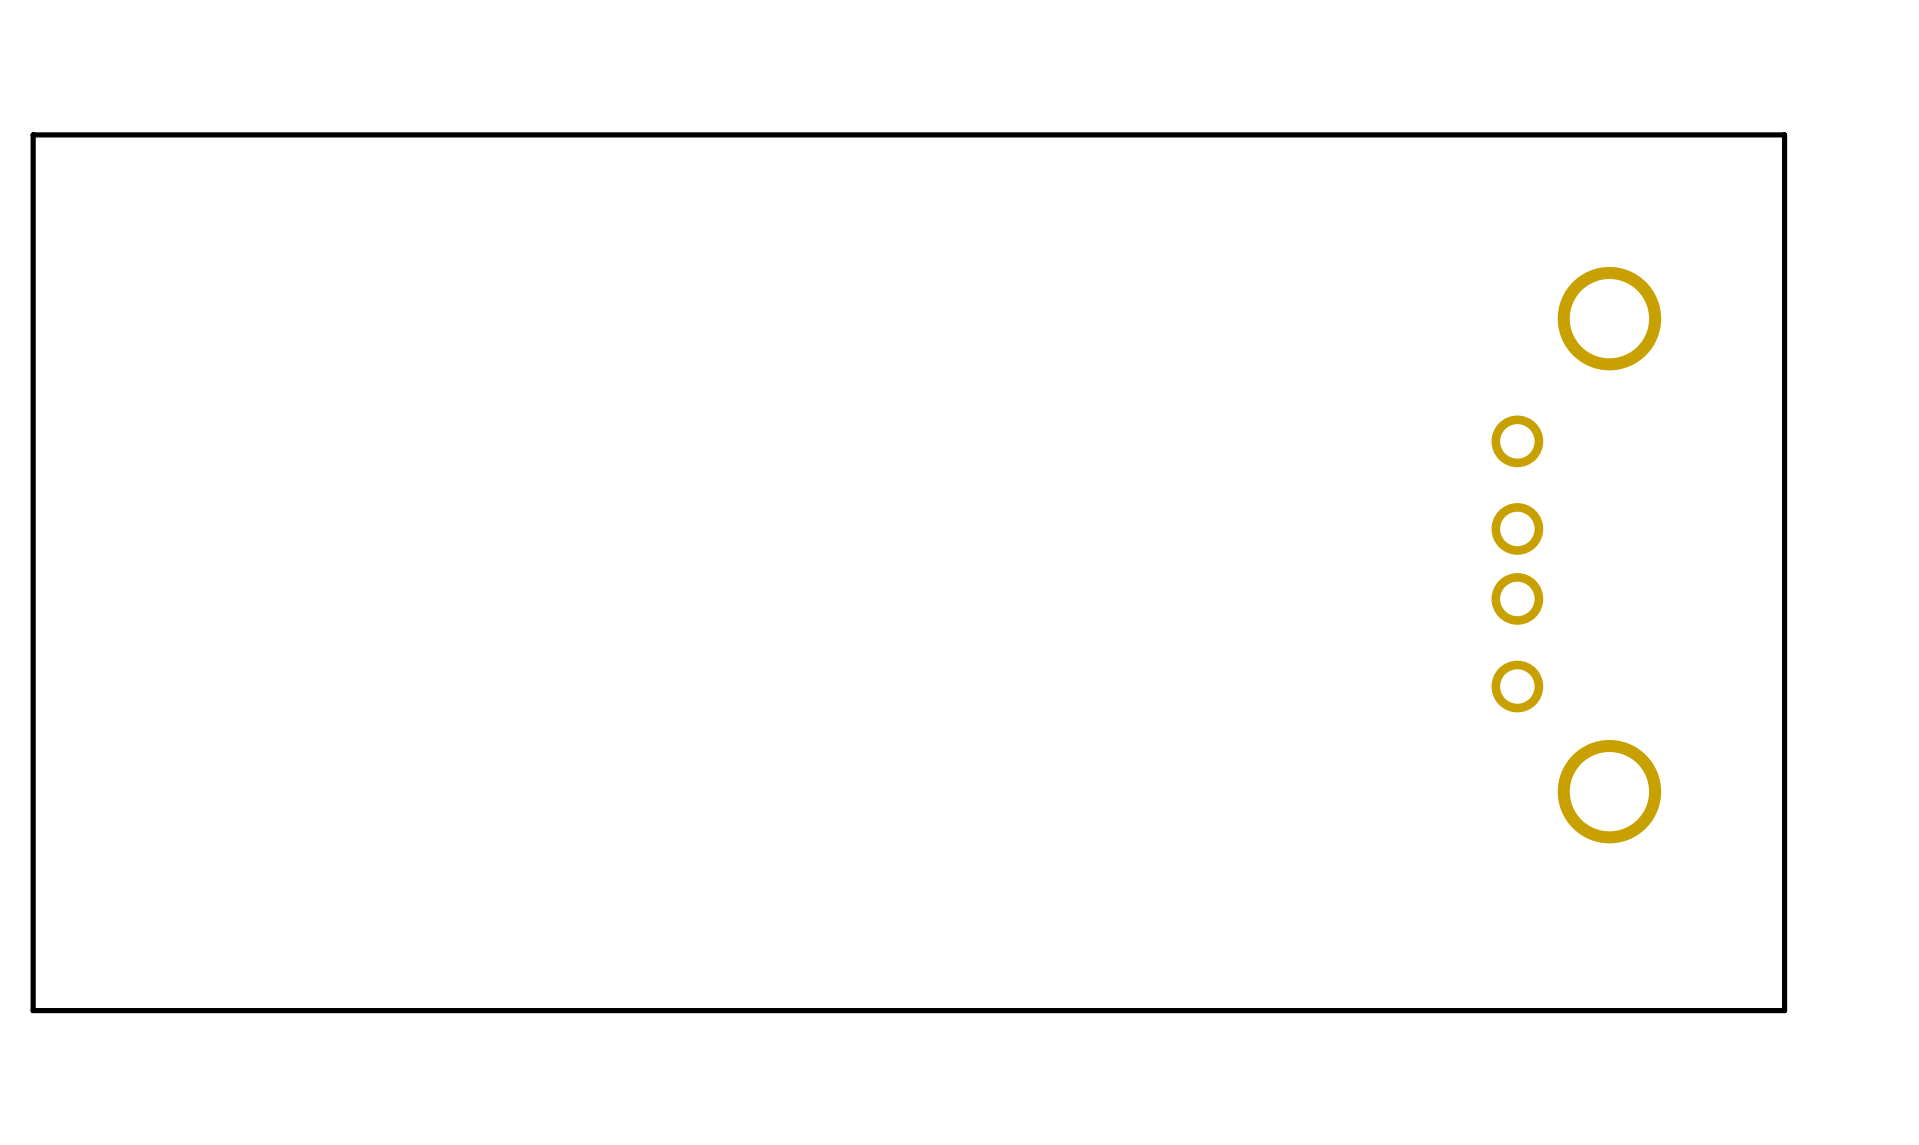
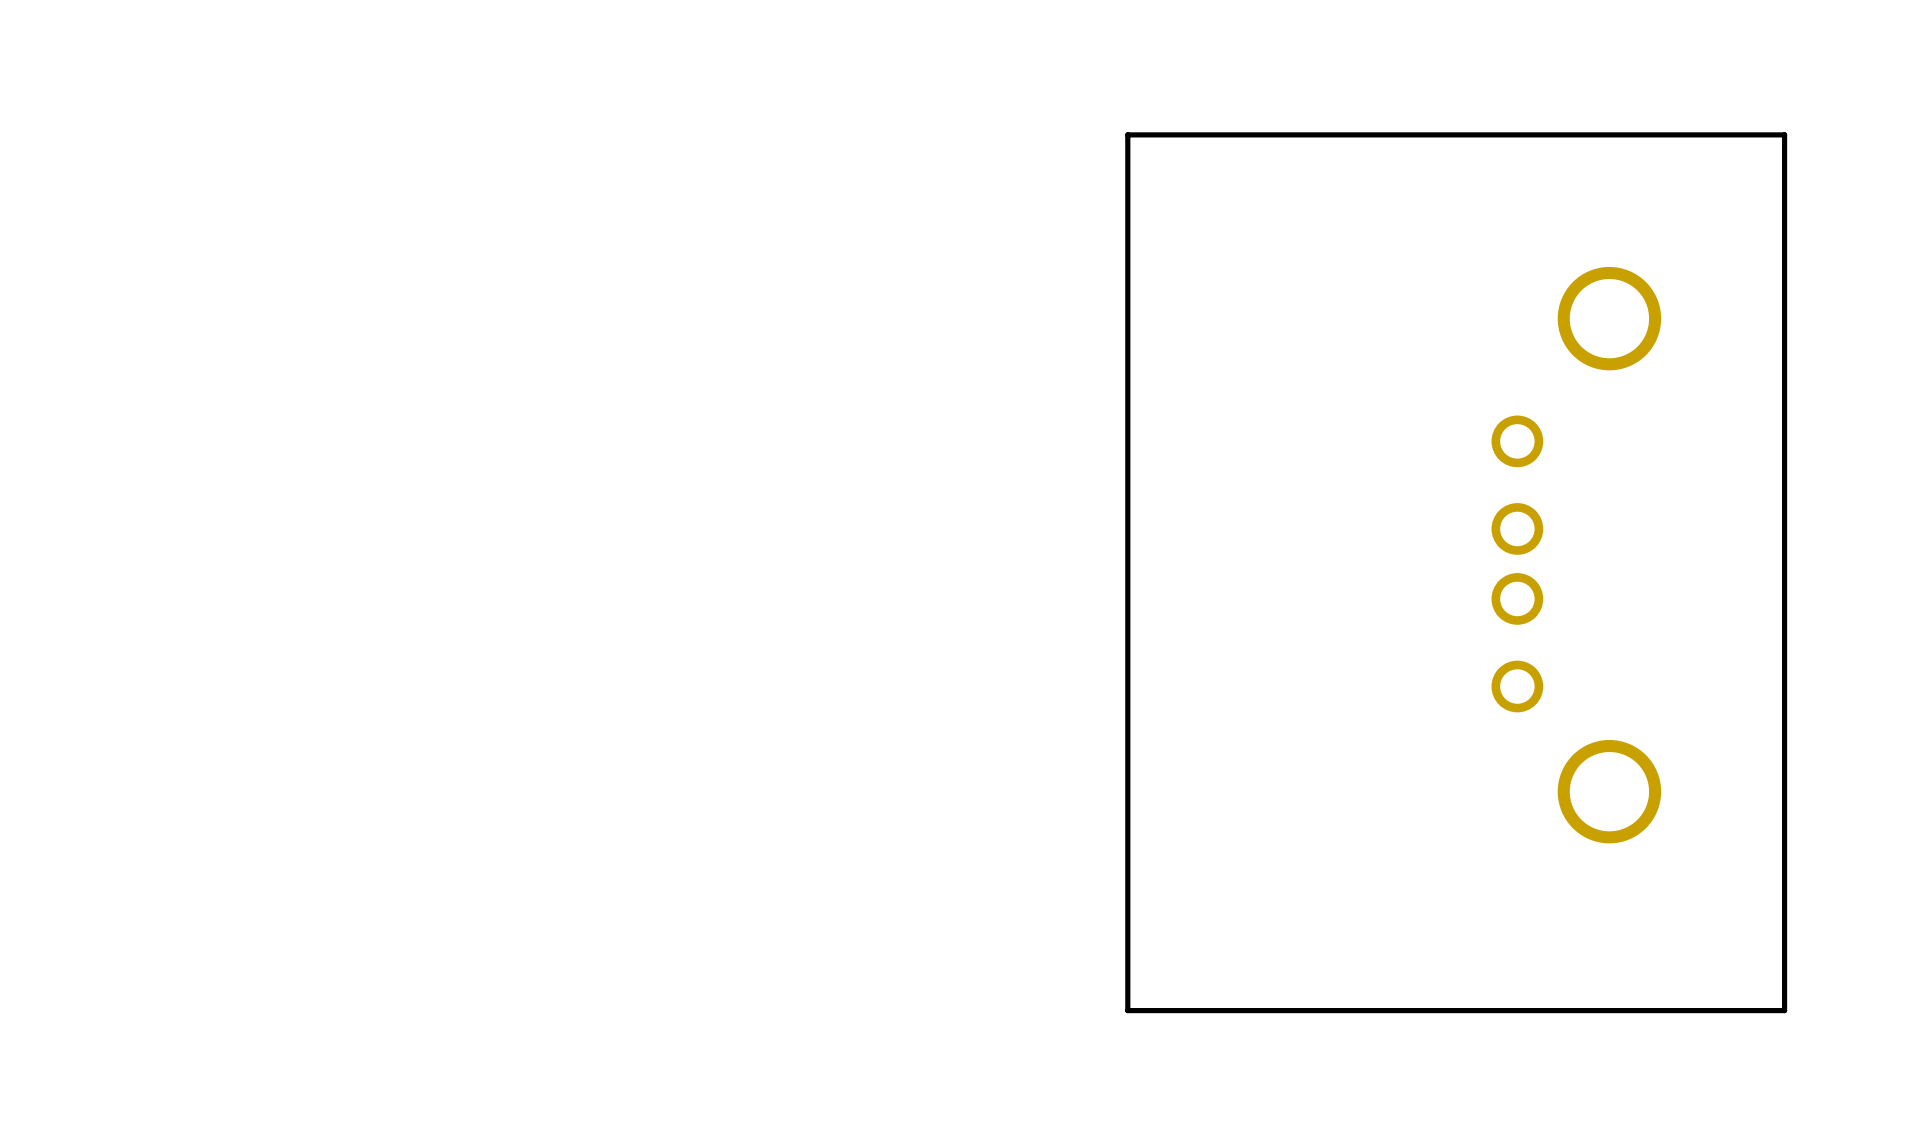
board edge: (1127, 134) (33, 134) (33, 1010) (1127, 1010) -> (1127, 134) (1127, 1010)

